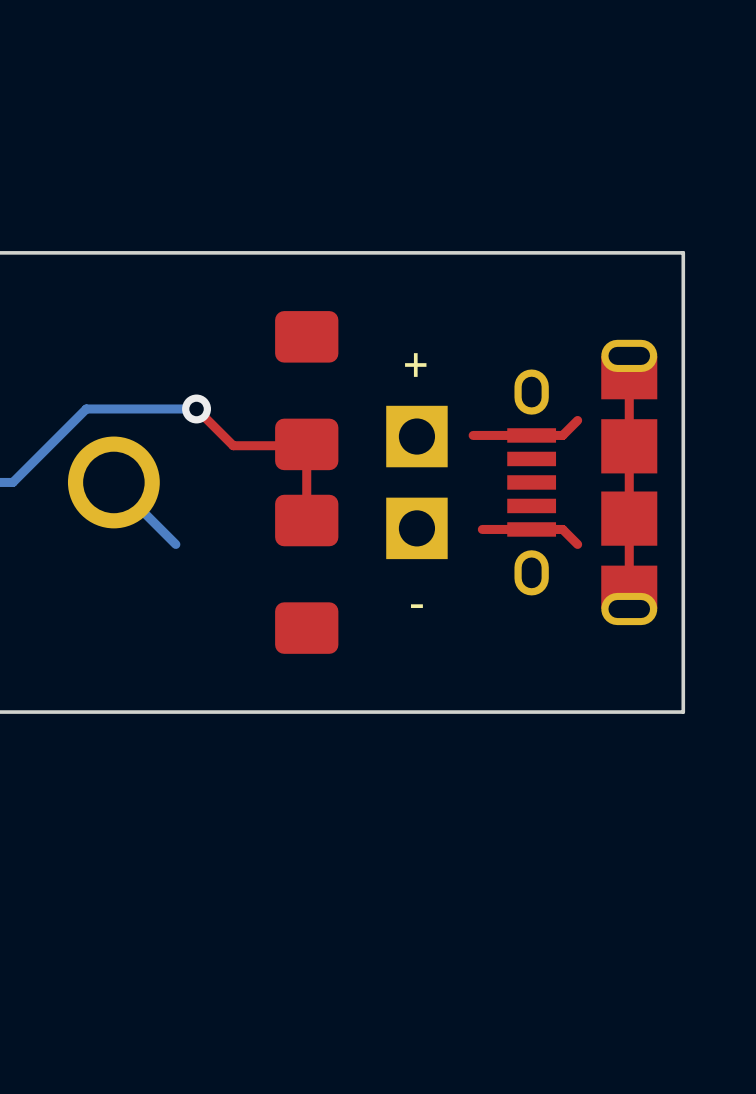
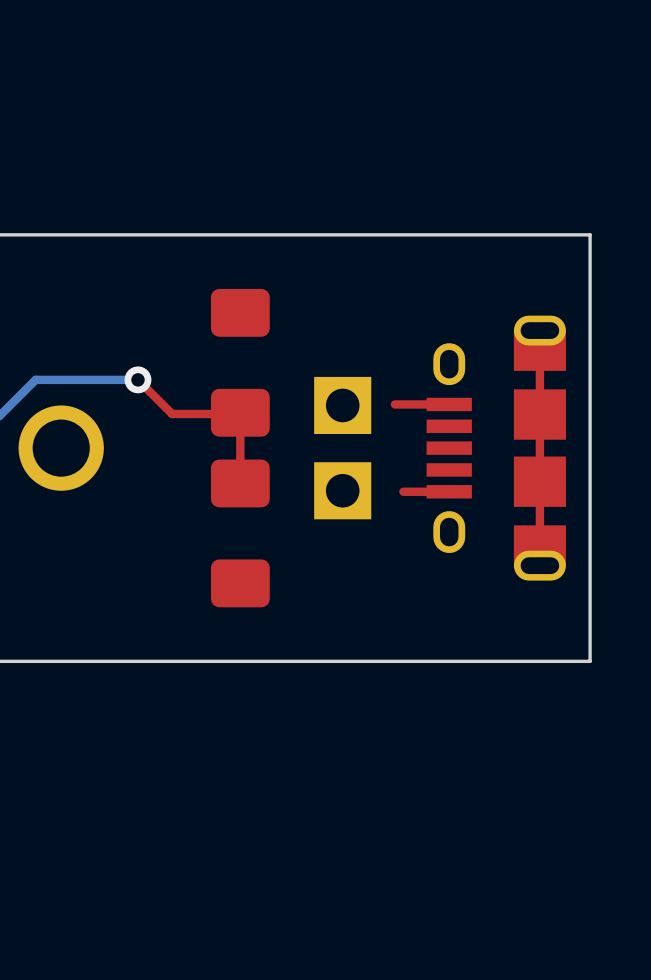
text: + (415, 365) -> none
top track: (577, 420) (562, 435) (531, 435) -> none
bottom track: (113, 482) (175, 544) -> none
top track: (531, 529) (562, 529) (577, 544) -> none
text: - (416, 606) -> none

